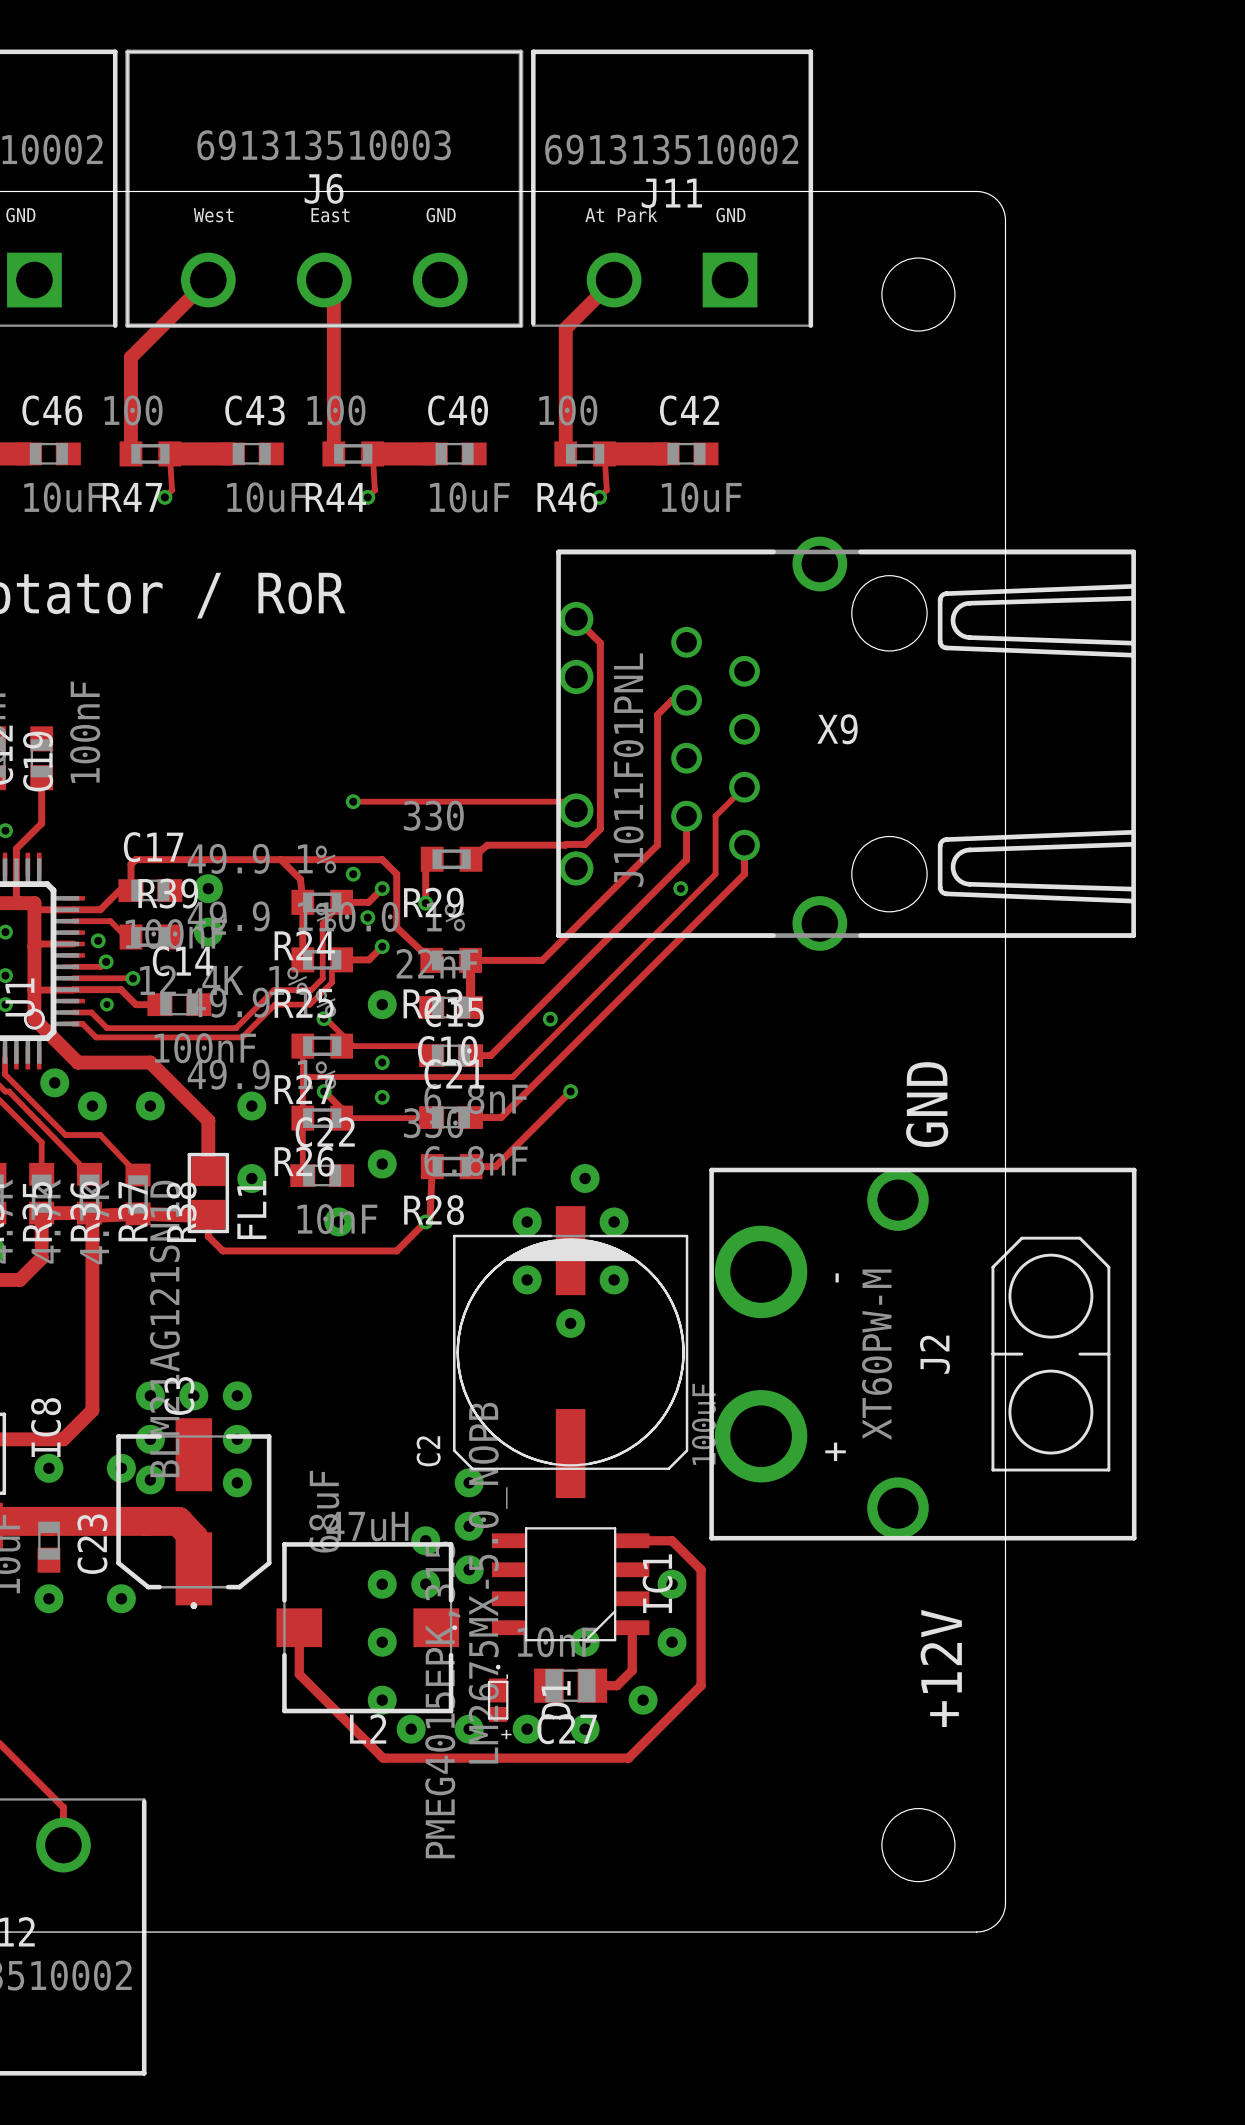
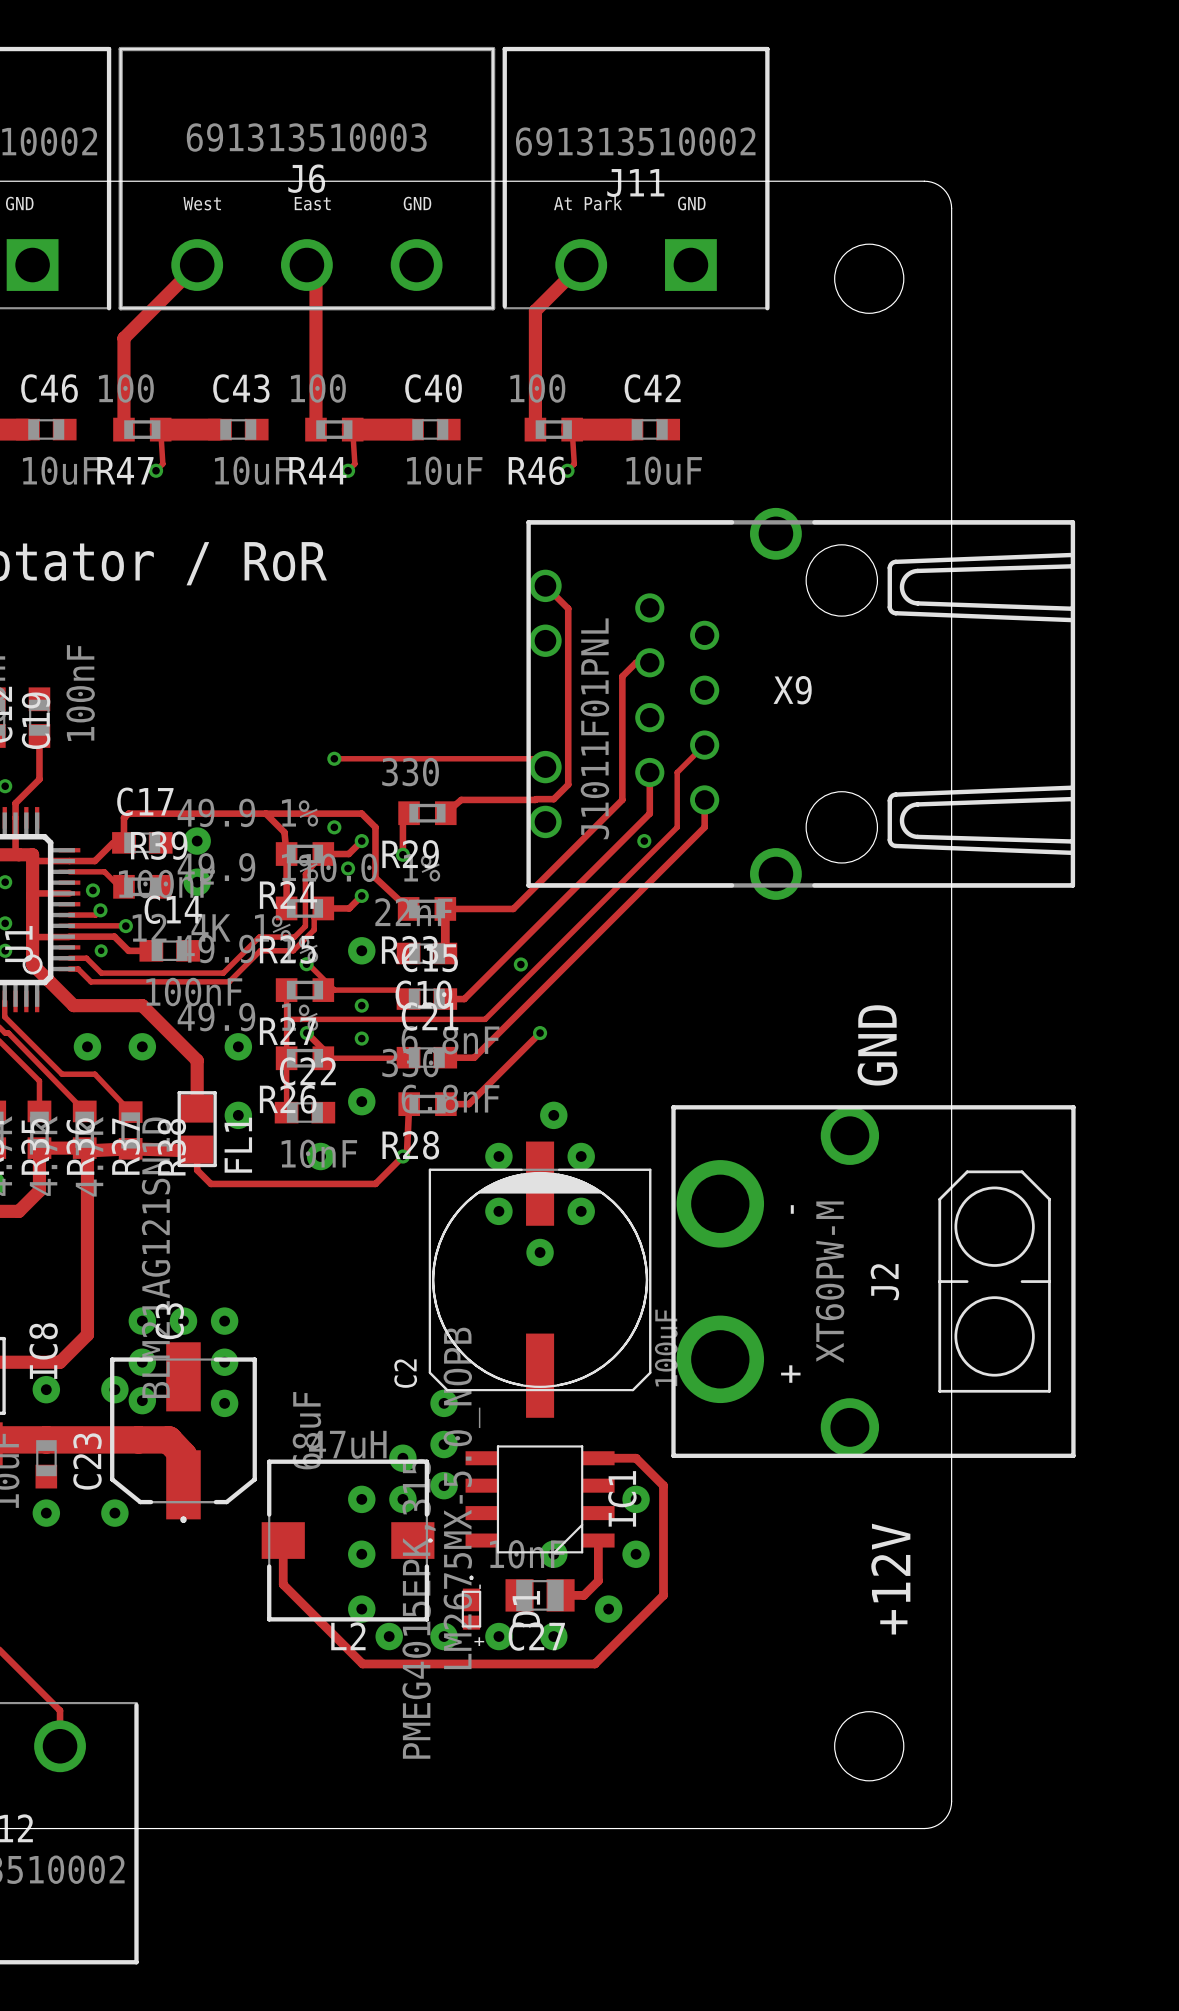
via: (54, 1082) -> none

